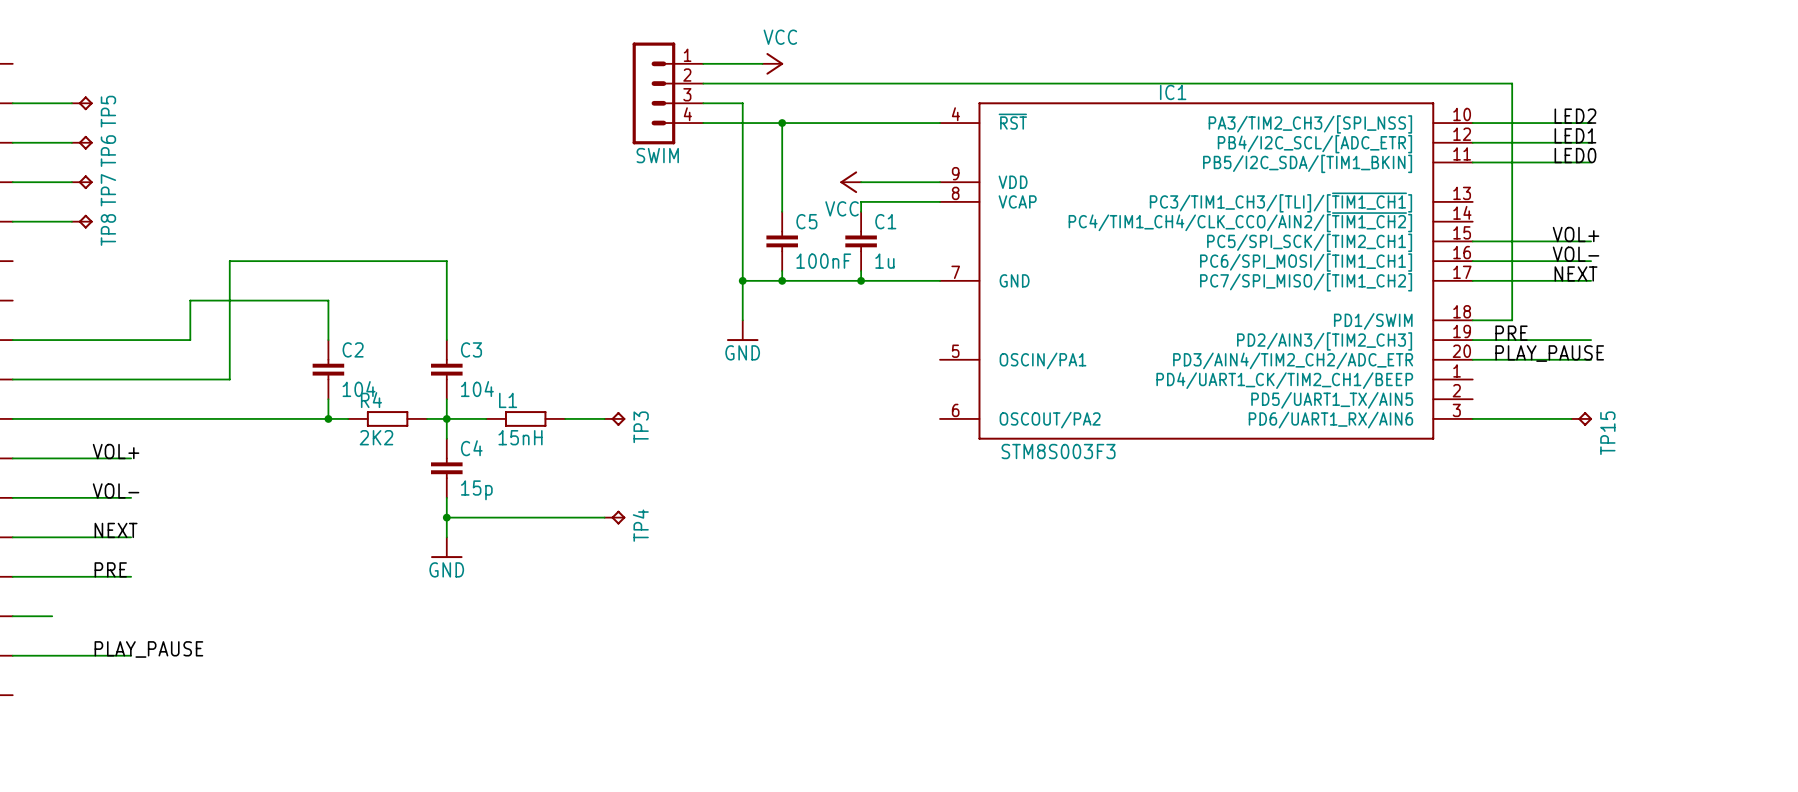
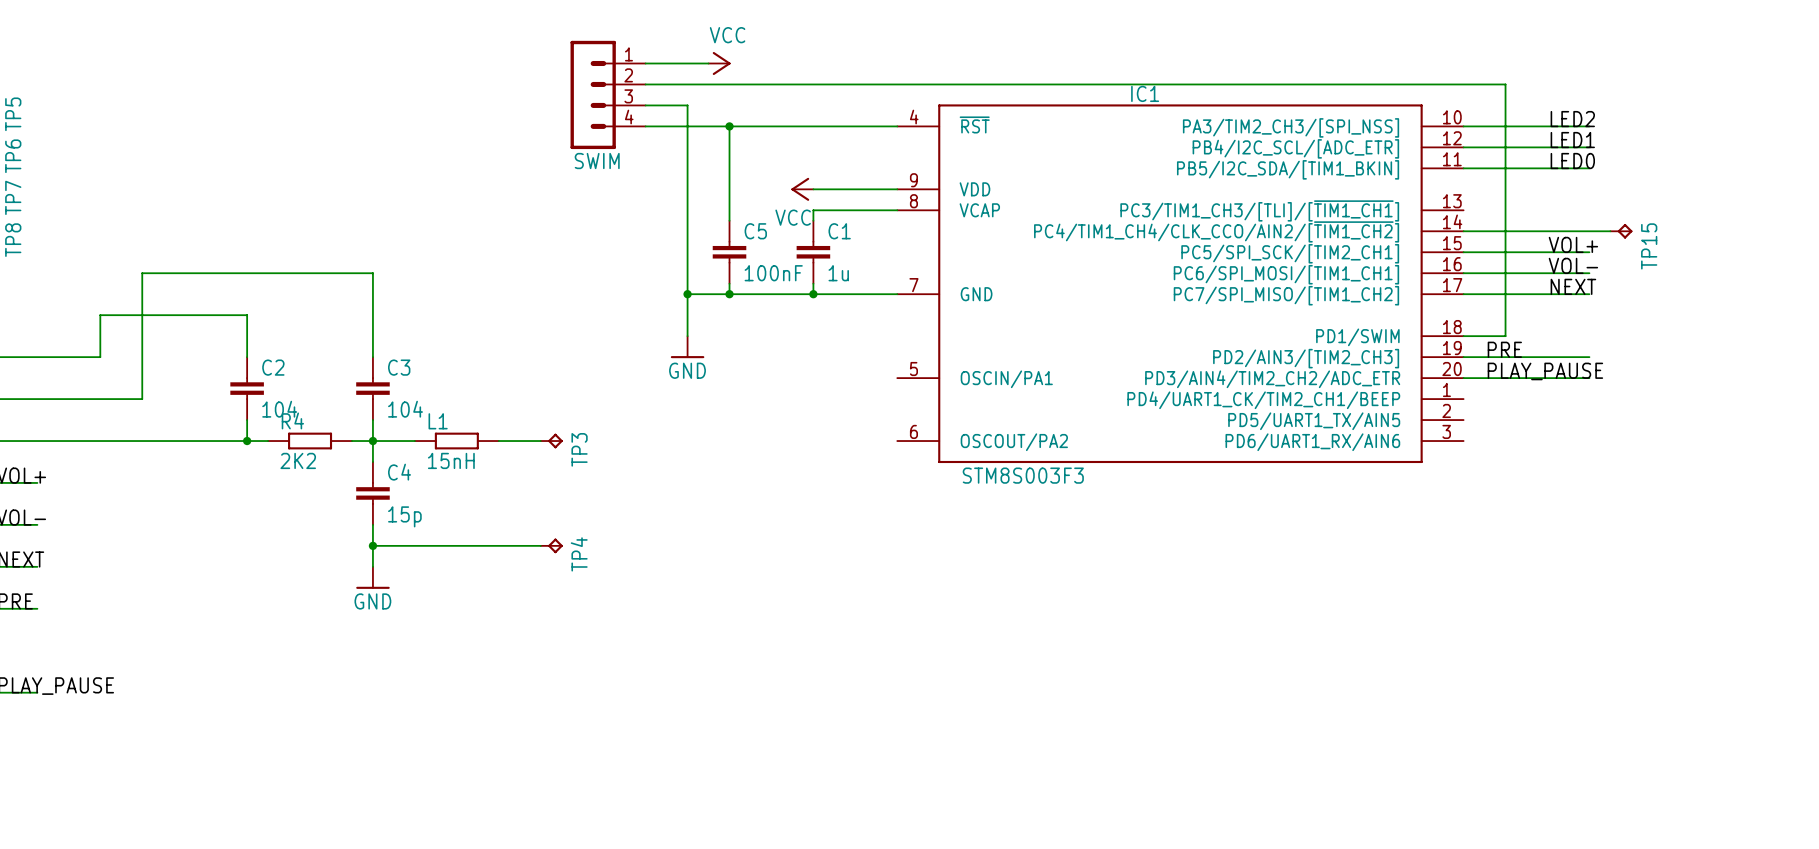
wire: none -> (1463, 231) (1610, 231)
wire: (1472, 418) (1571, 418) -> none
TP15 position: (1581, 418) -> (1621, 231)

